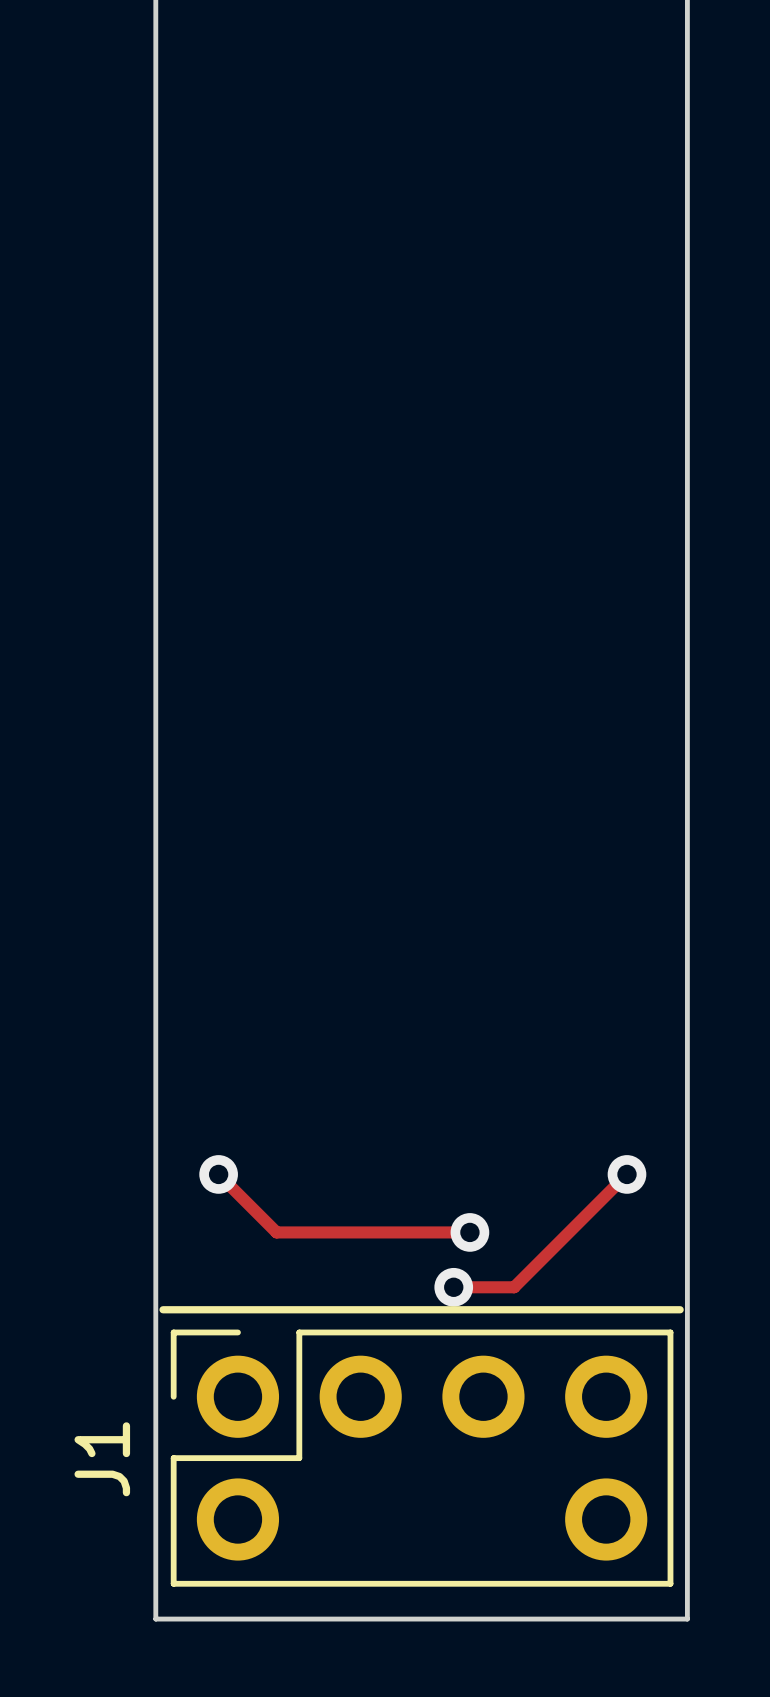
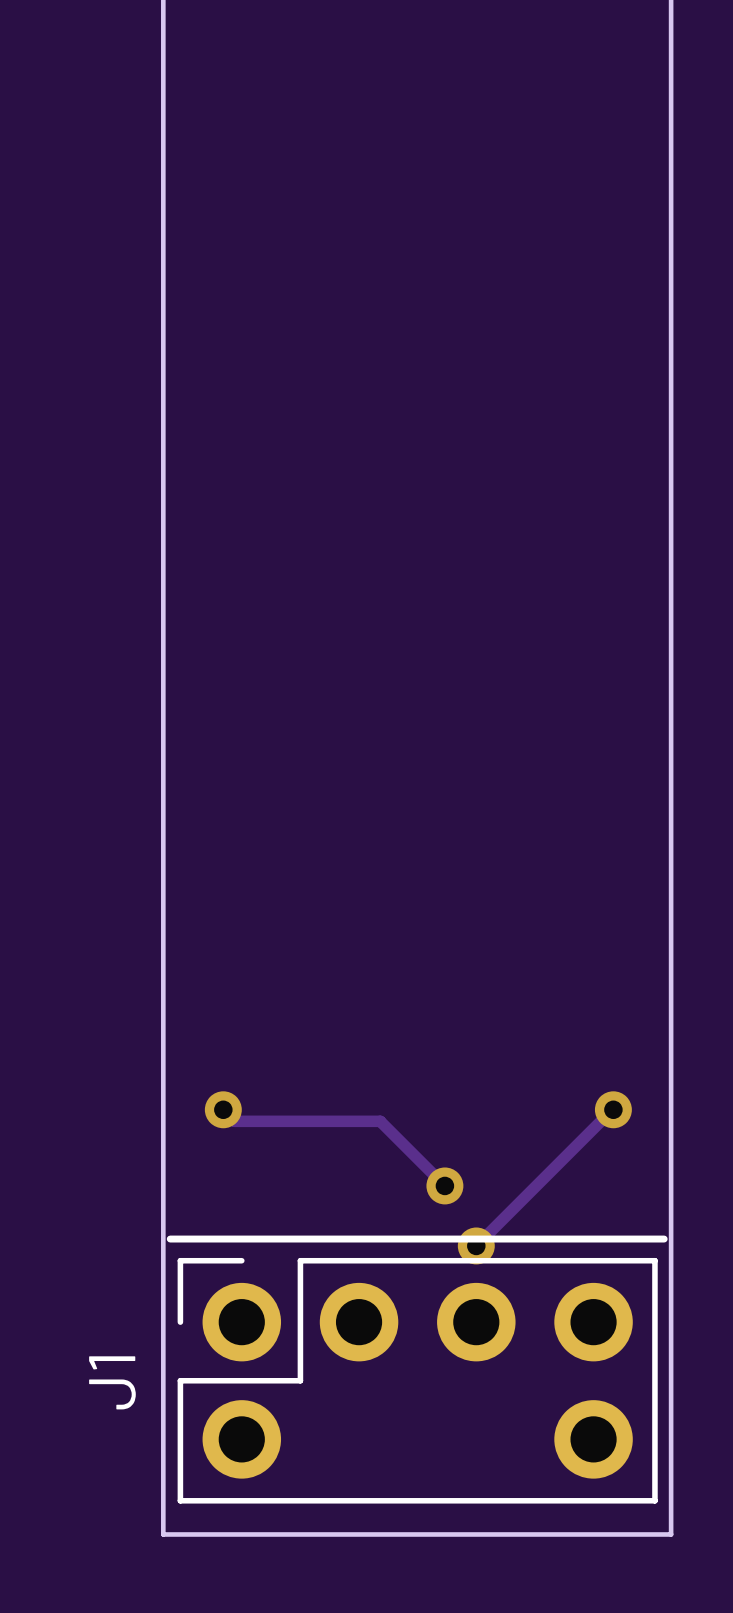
track: (626, 1174) (514, 1287) (453, 1287) -> (612, 1109) (476, 1245)
track: (230, 1186) (276, 1232) (469, 1232) -> (234, 1121) (380, 1121) (444, 1185)
via: (469, 1232) -> none
via: none -> (444, 1185)
via: (453, 1287) -> none
via: none -> (476, 1245)

